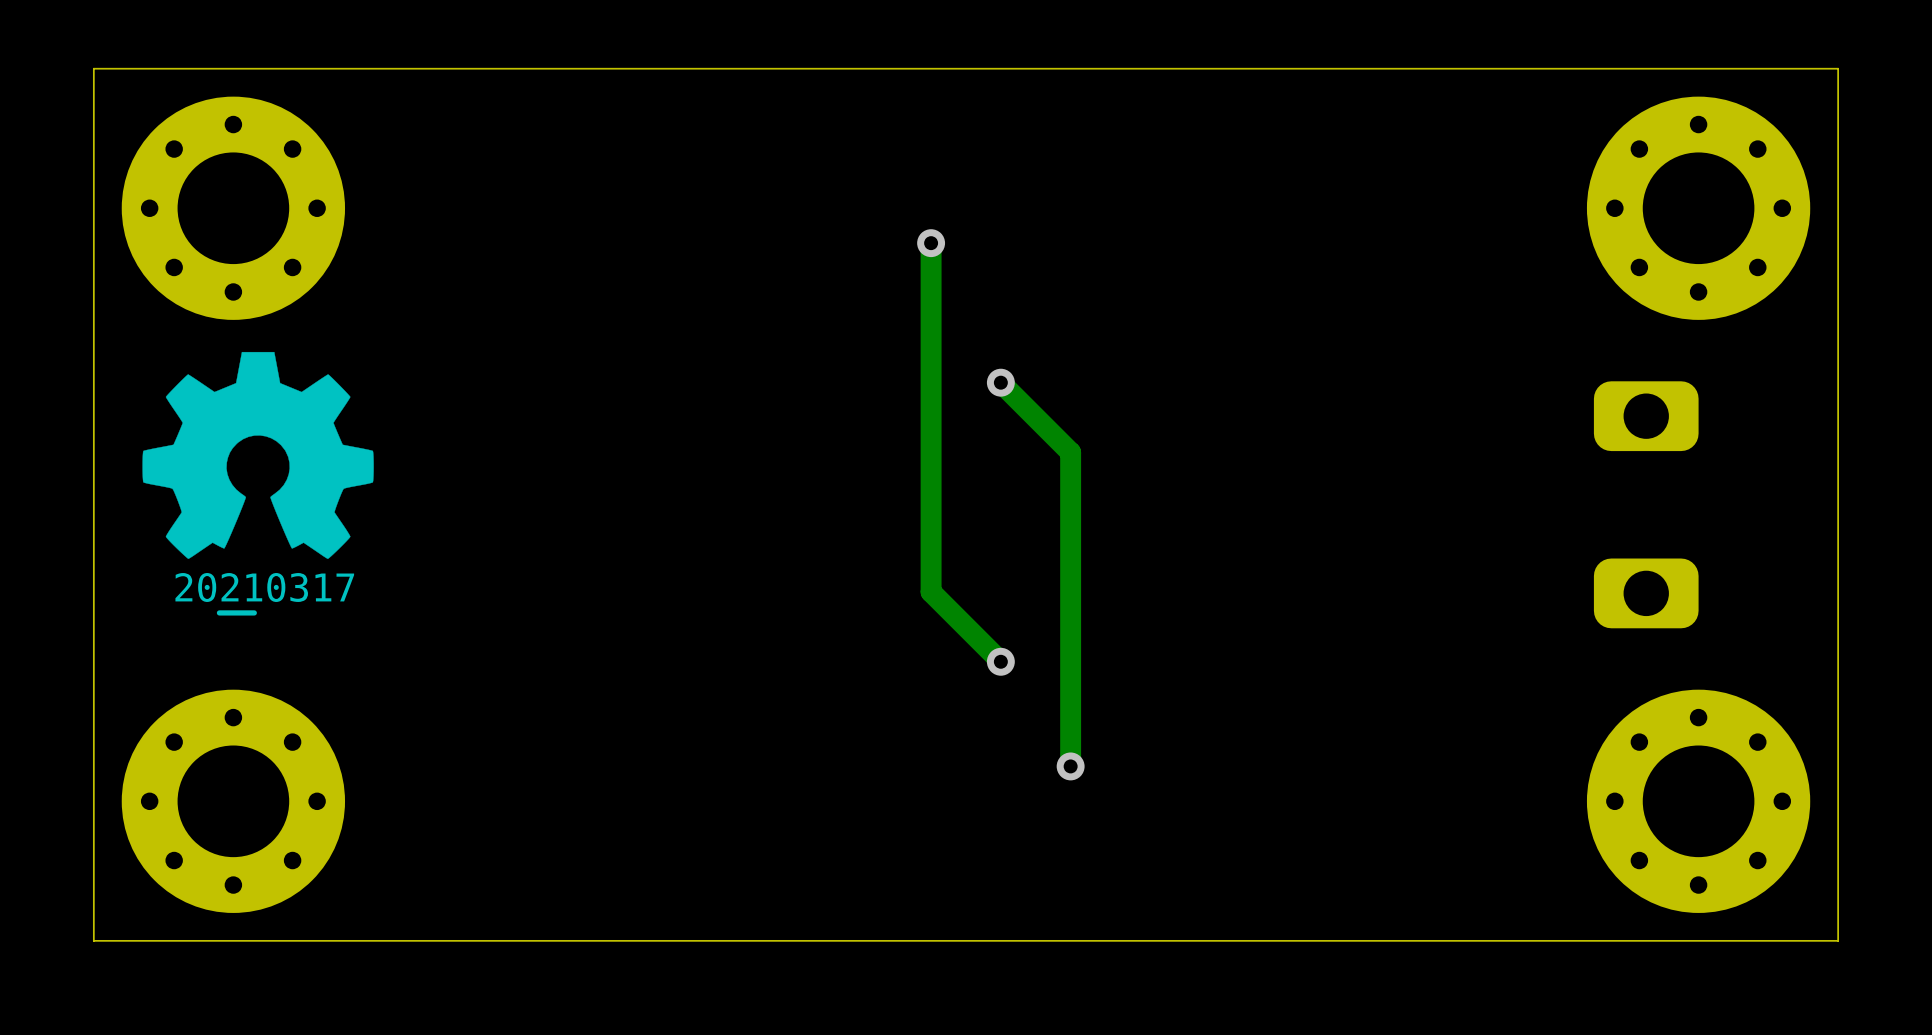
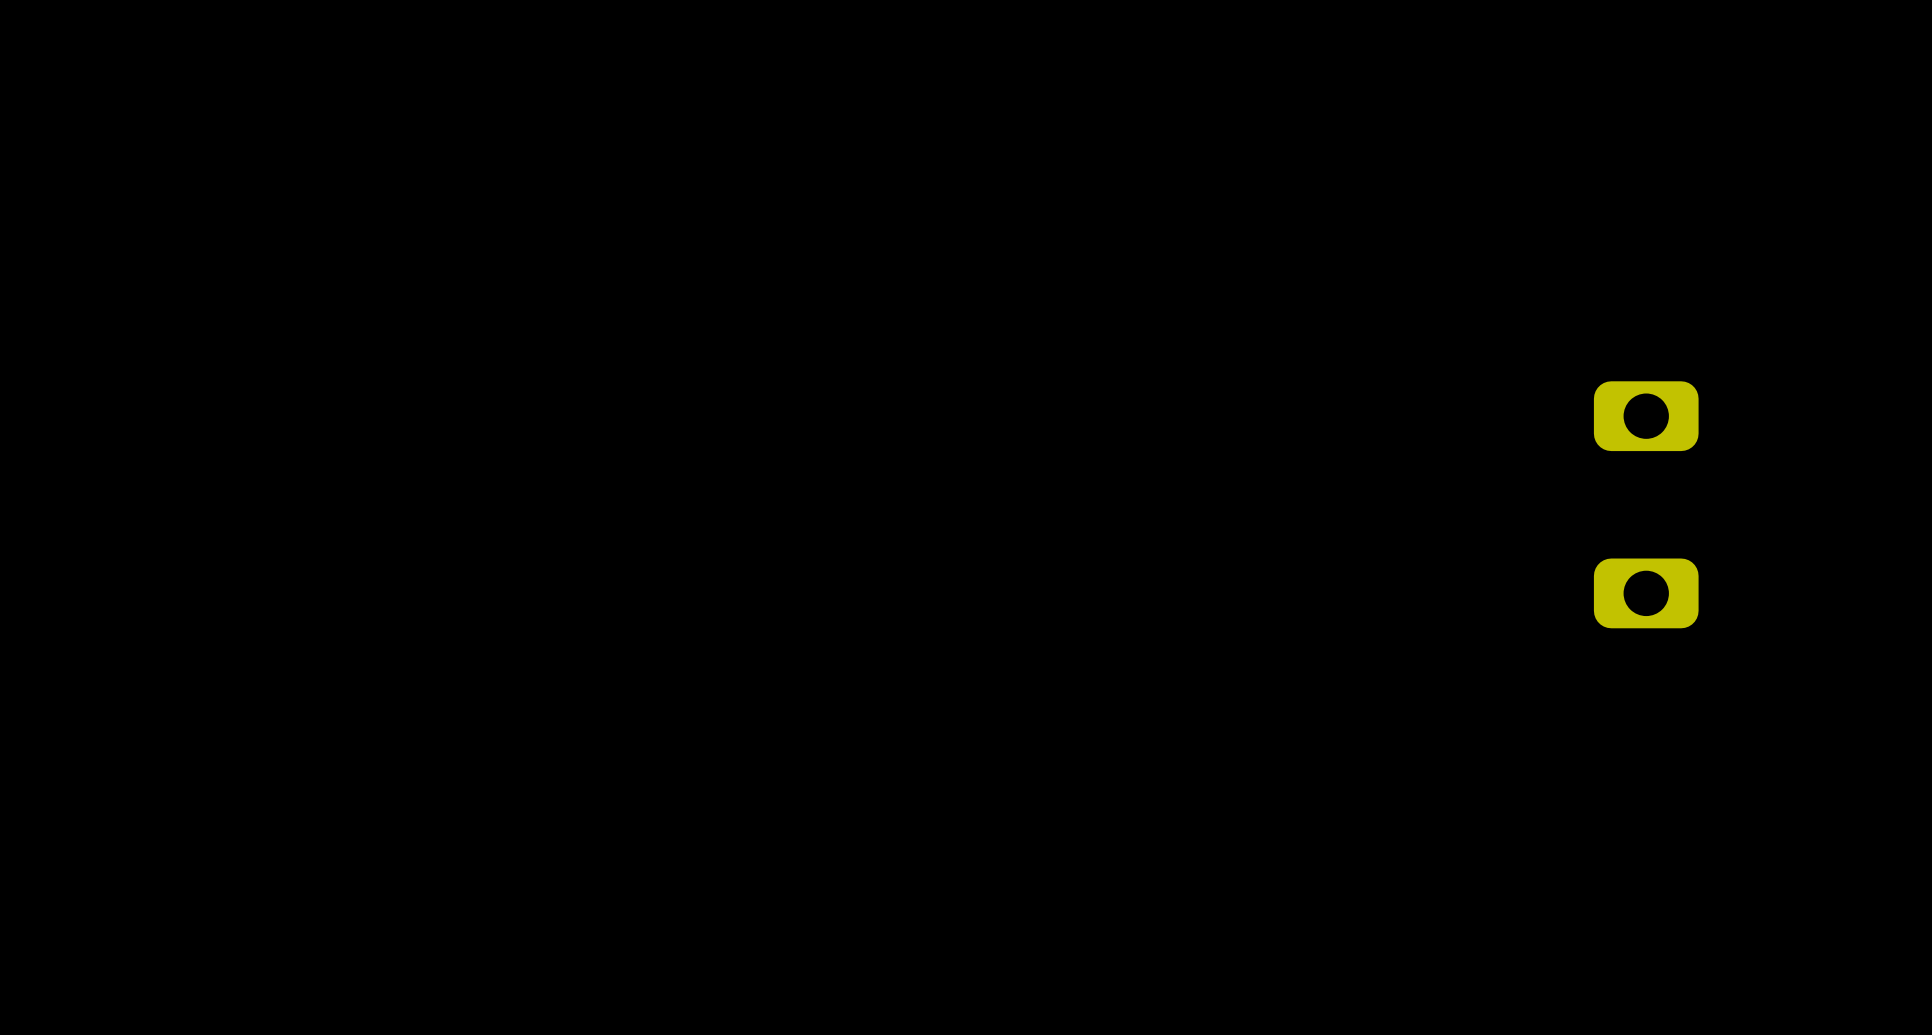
board edge: (1838, 68) (93, 68) (93, 940) (1838, 940) (1838, 68) -> none
part: (233, 208) -> none
part: (1698, 208) -> none
track: (931, 243) (931, 592) (1000, 661) -> none
via: (931, 243) -> none
drawing: [142, 351, 374, 616] -> none
track: (1000, 382) (1070, 452) (1070, 766) -> none
via: (1000, 382) -> none
via: (1000, 661) -> none
via: (1070, 766) -> none
part: (233, 801) -> none
part: (1698, 801) -> none

